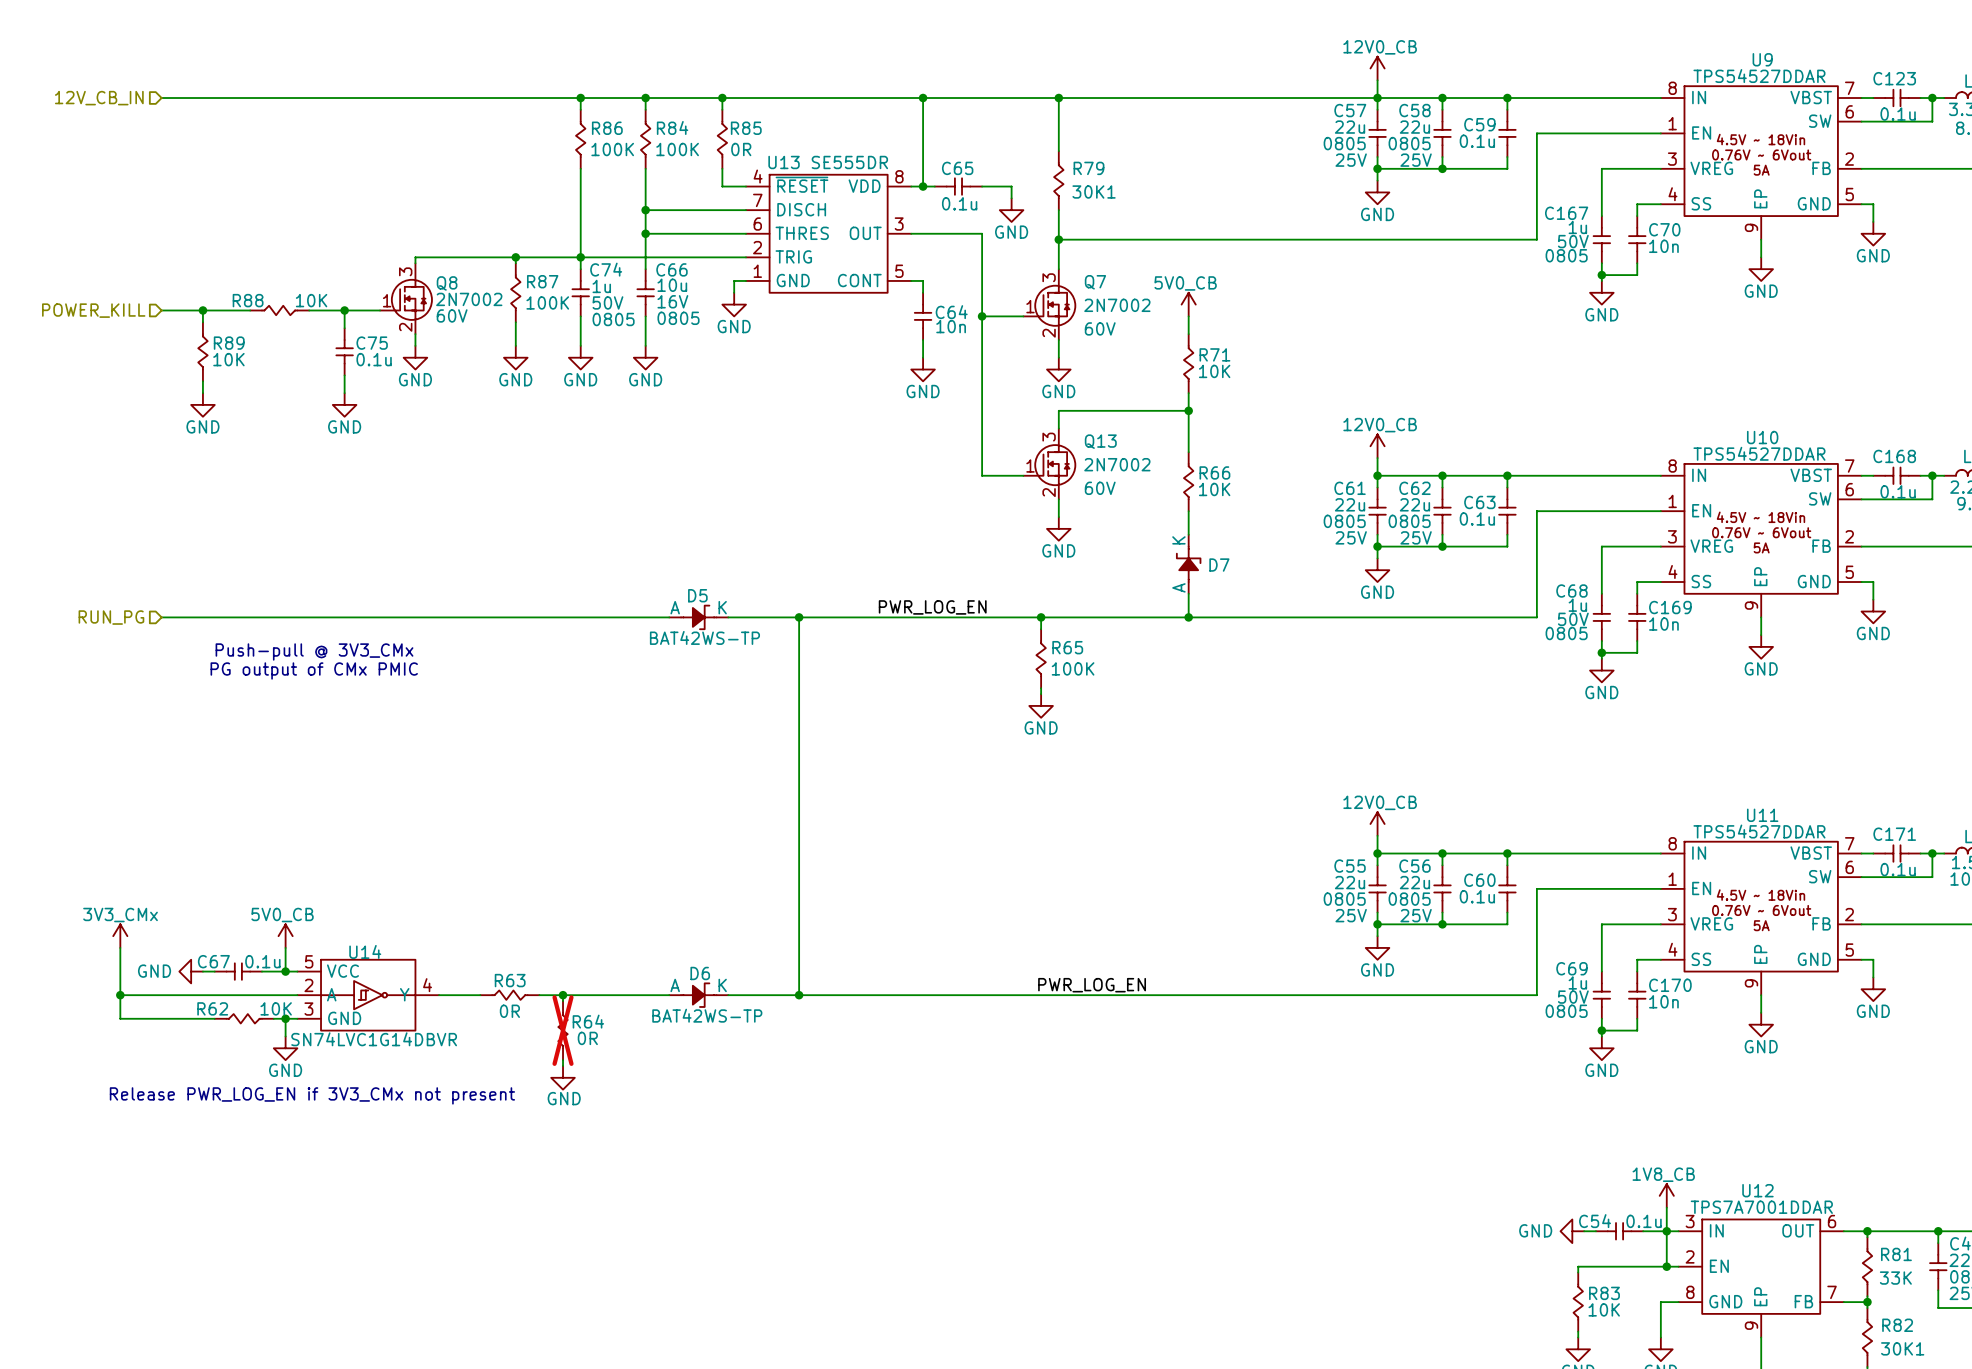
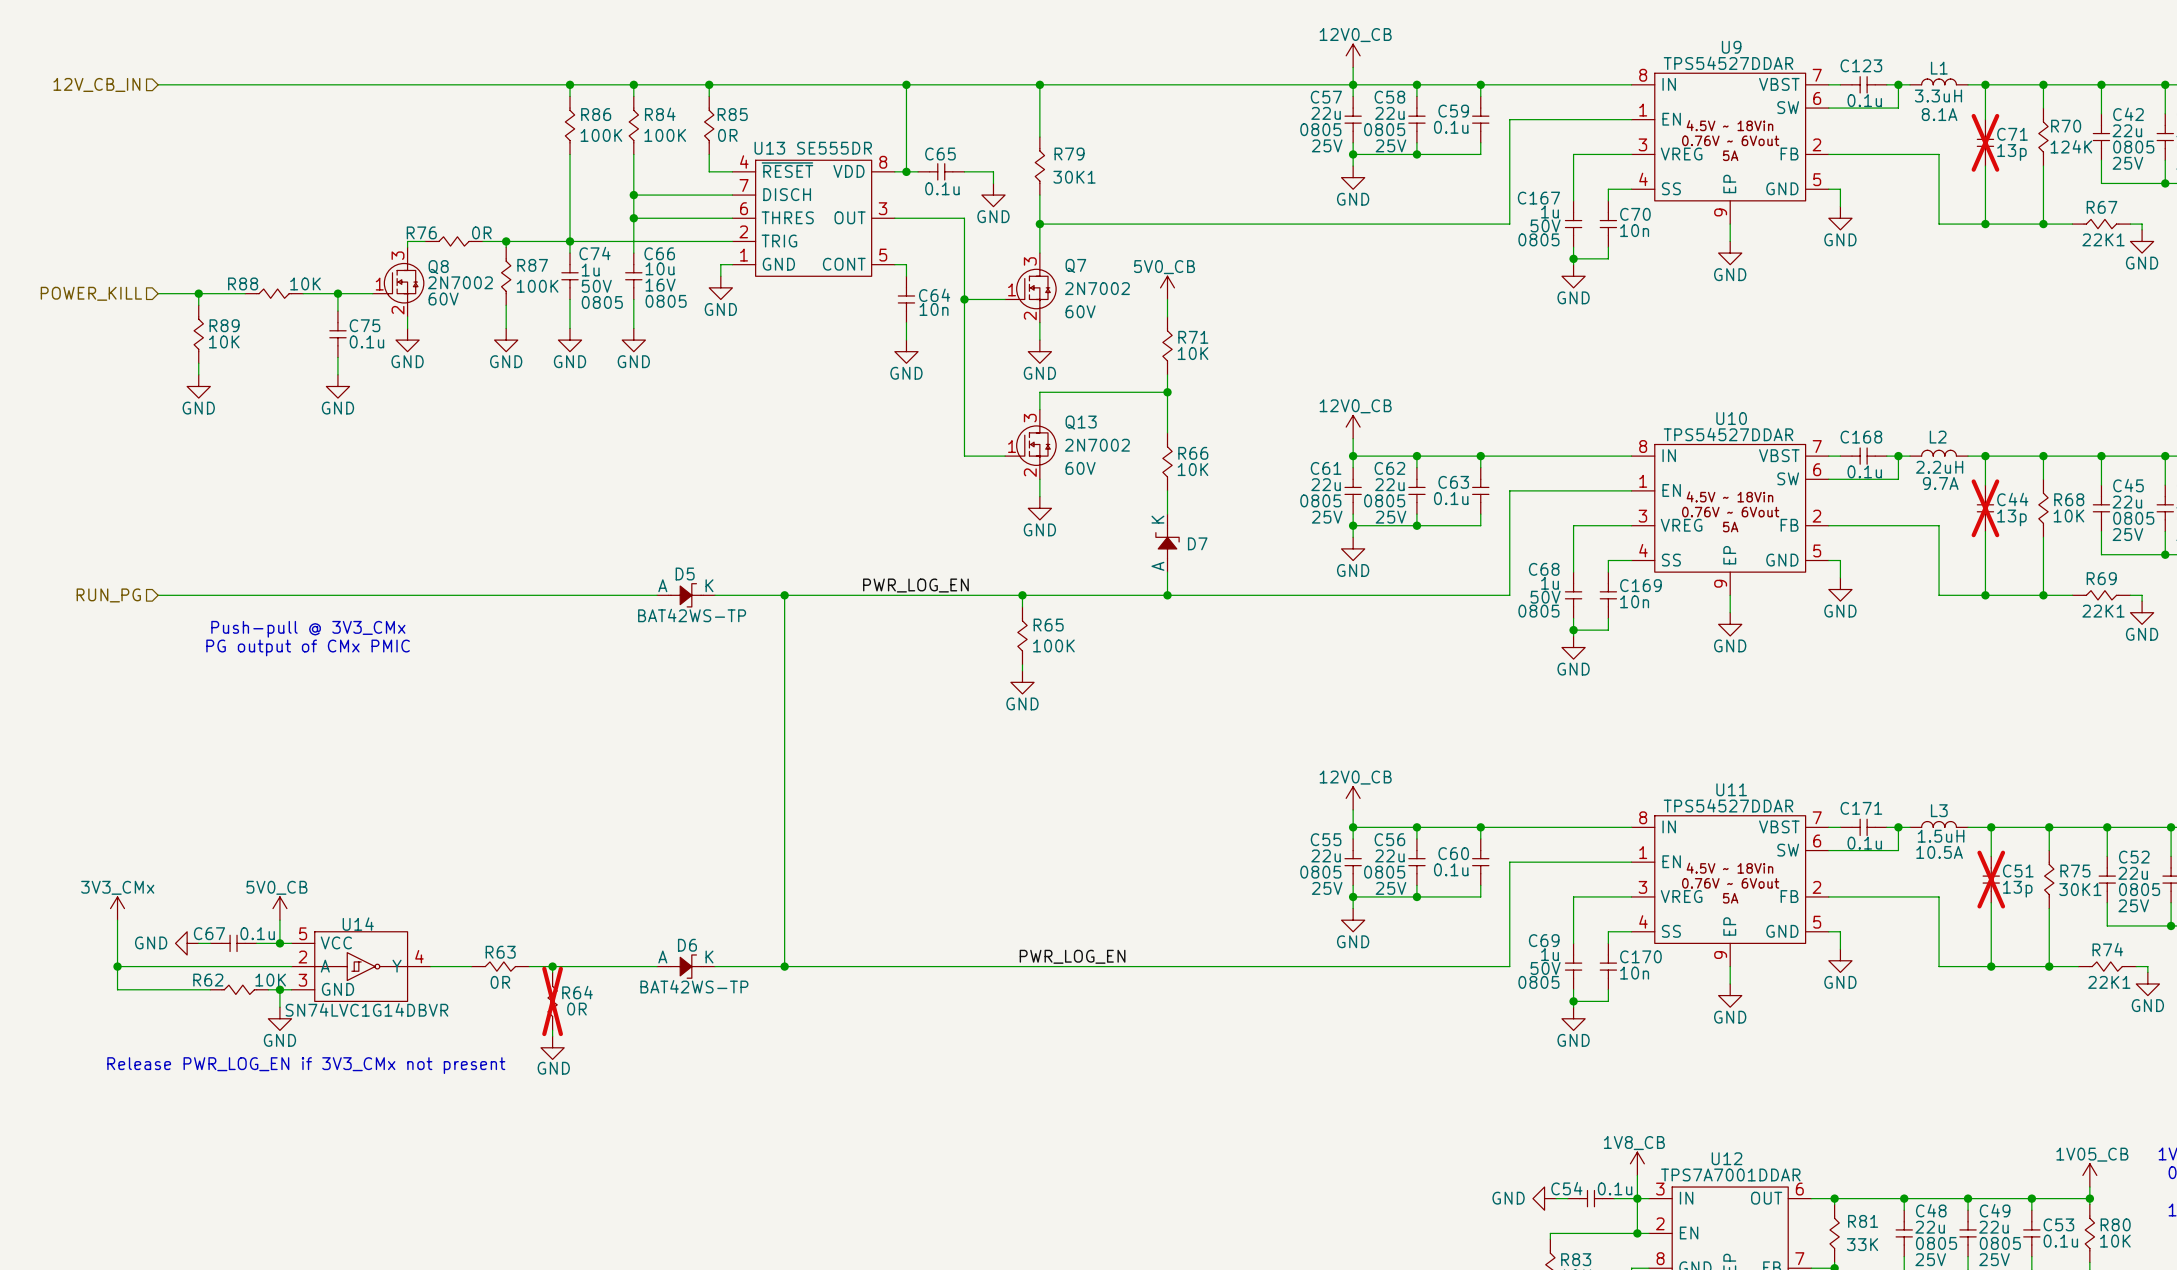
R76: none -> 0R (453, 241)

